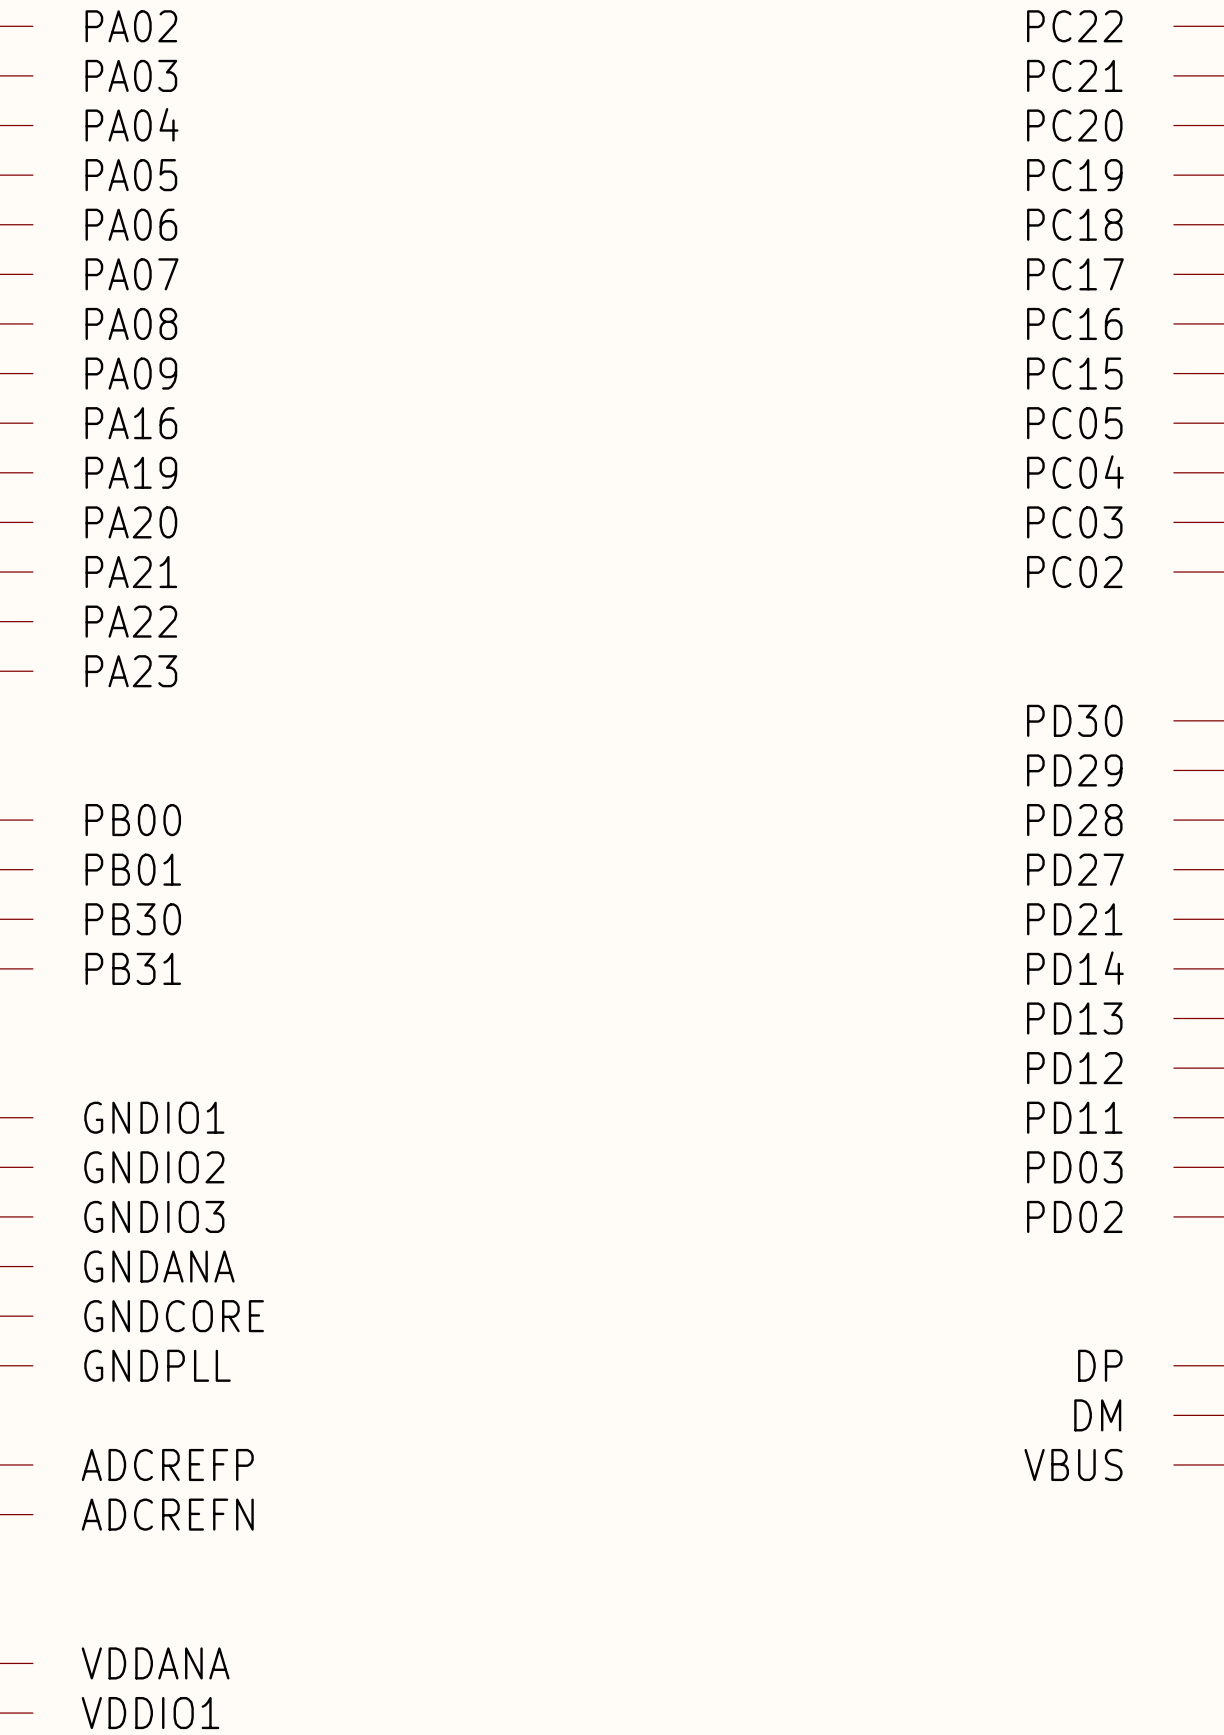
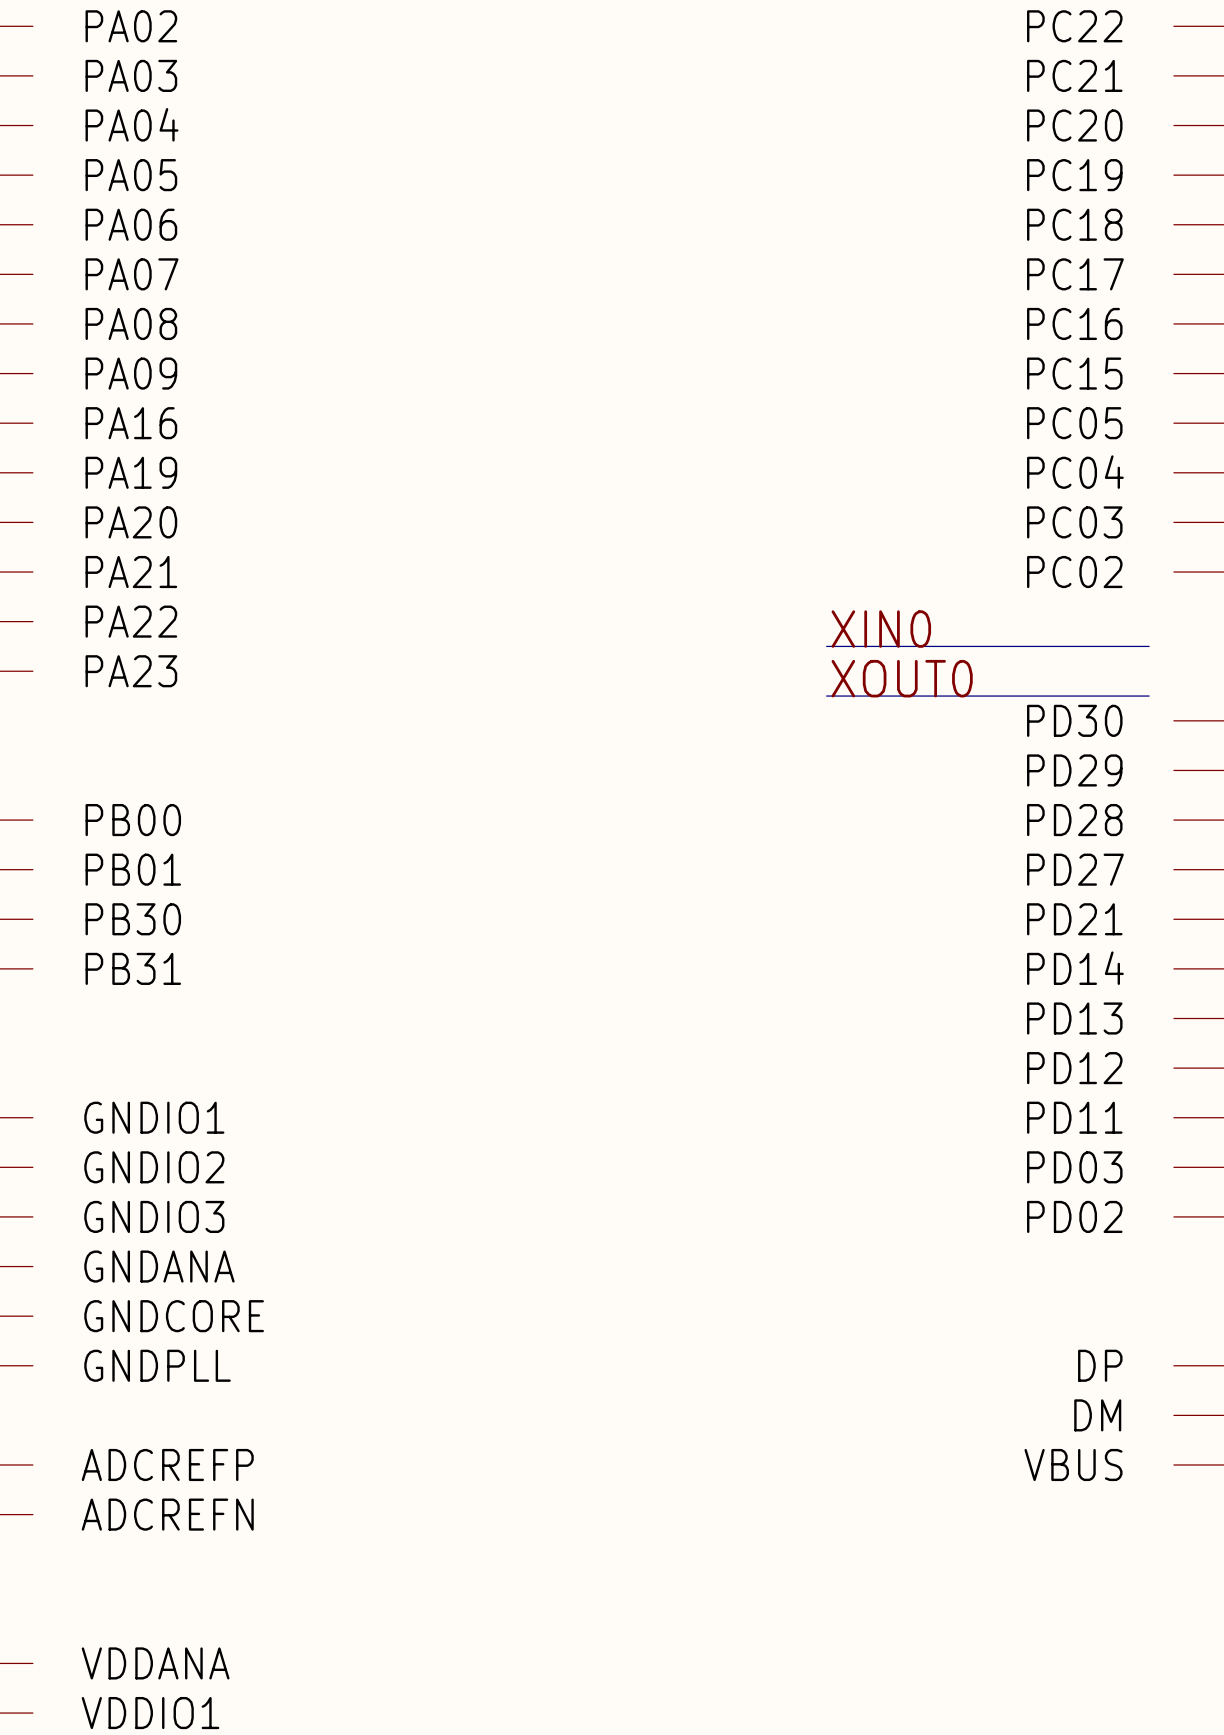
label: none -> XIN0 (881, 629)
wire: none -> (826, 646) (1149, 646)
label: none -> XOUT0 (902, 678)
wire: none -> (826, 696) (1149, 696)

